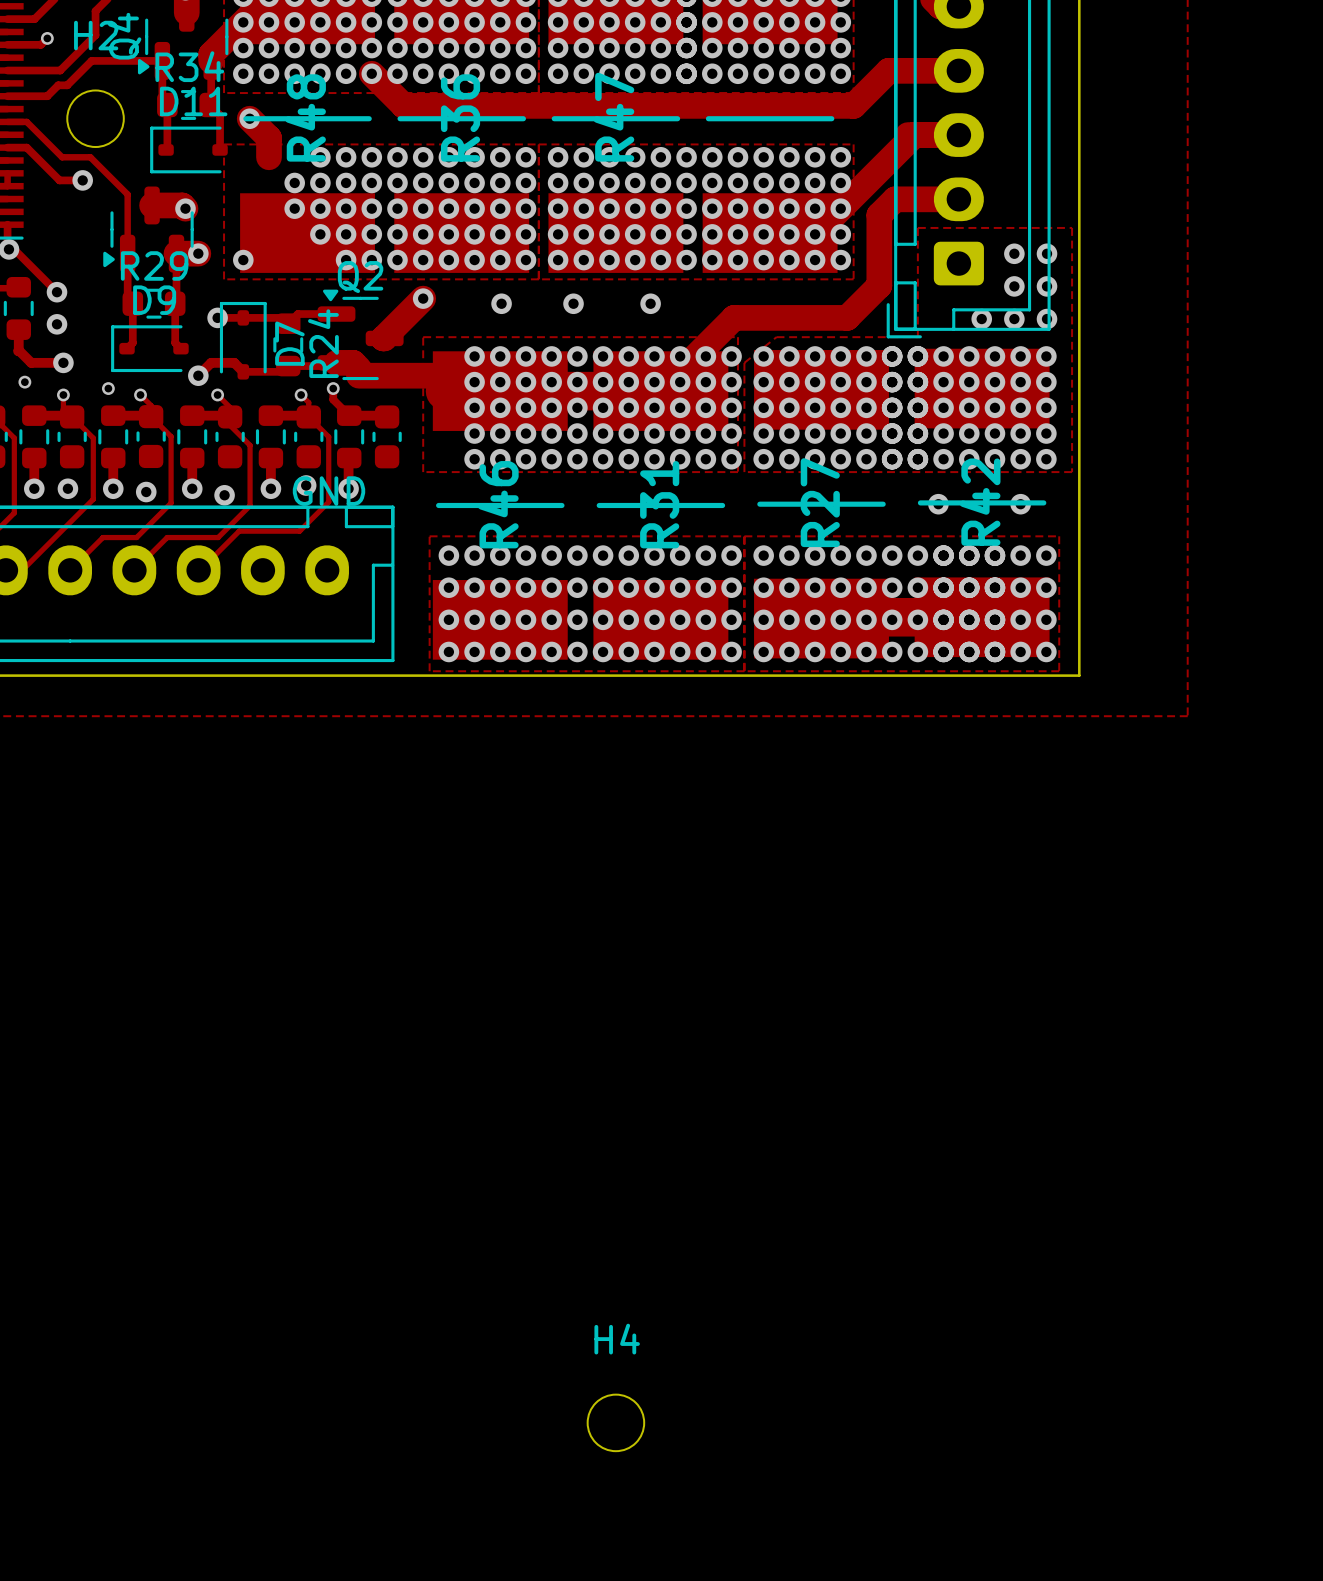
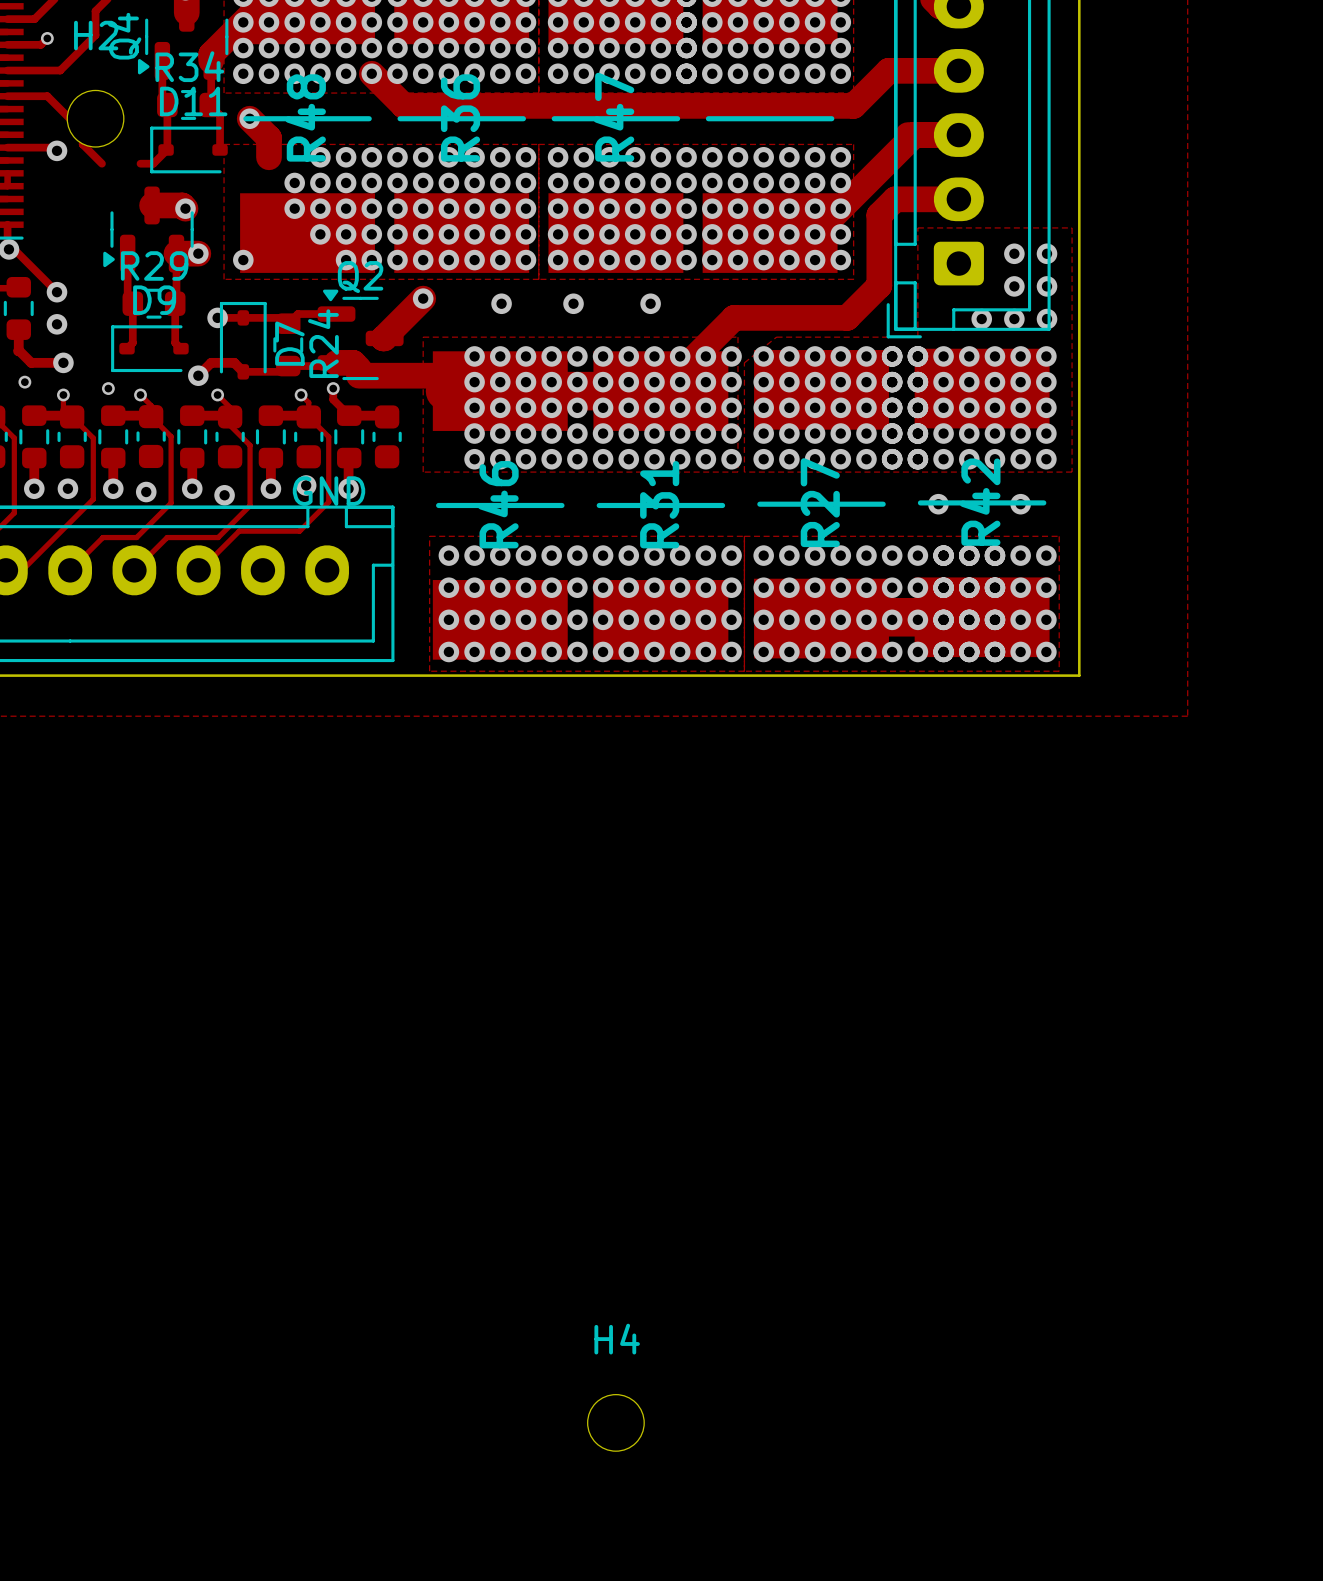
track: (162, 60) (91, 60) (67, 85) (58, 85) (47, 96) -> (101, 163) (82, 144) (82, 131) (47, 96)
track: (7, 121) (26, 121) (62, 157) (90, 157) (127, 194) (127, 253) -> none
track: (26, 147) (59, 180) (82, 180) -> (26, 147) (53, 147) (57, 150)
track: none -> (166, 150) (153, 163) (140, 163)
via position: (82, 180) -> (57, 150)

